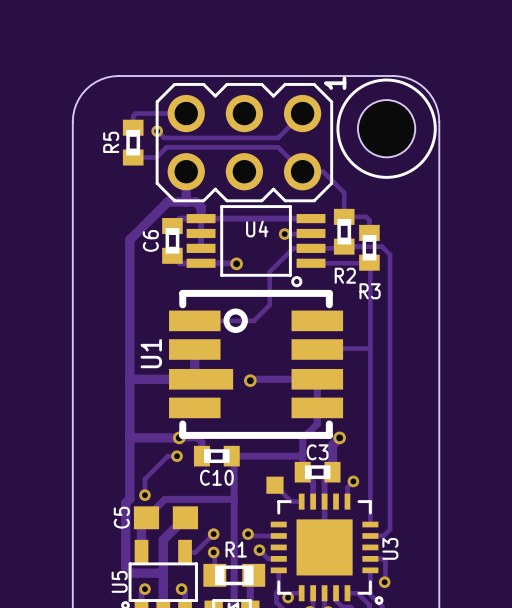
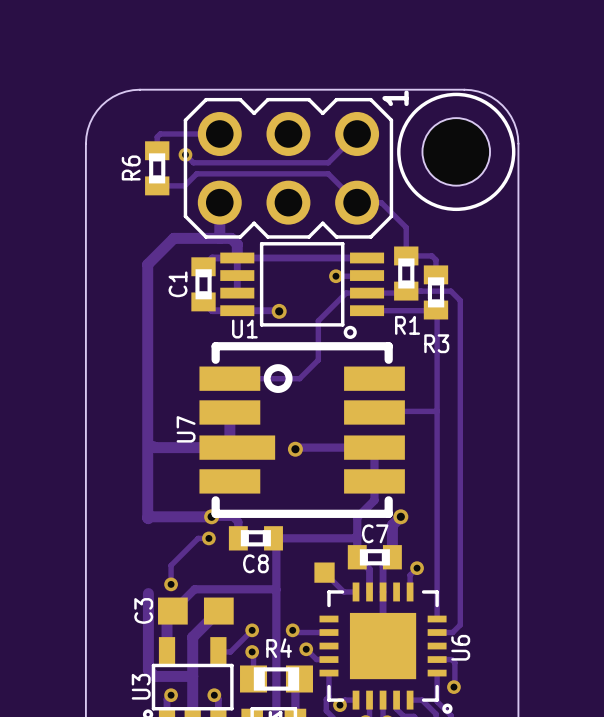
R5 name: R5 (111, 142) -> R6 (131, 167)
track: (167, 201) (129, 239) (129, 498) (125, 502) -> (197, 238) (173, 238) (147, 264) (148, 518)
U4 name: U4 (257, 229) -> U1 (244, 329)
C6 name: C6 (150, 240) -> C1 (178, 284)
R2 name: R2 (345, 275) -> R1 (407, 325)
U1 name: U1 (151, 353) -> U7 (186, 429)
C3 name: C3 (317, 452) -> C7 (375, 533)
C10 name: C10 (216, 477) -> C8 (255, 563)
C5 name: C5 (121, 517) -> C3 (143, 610)
U3 name: U3 (390, 548) -> U6 (460, 647)
R1 name: R1 (236, 549) -> R4 (279, 648)
U5 name: U5 (119, 581) -> U3 (141, 686)

